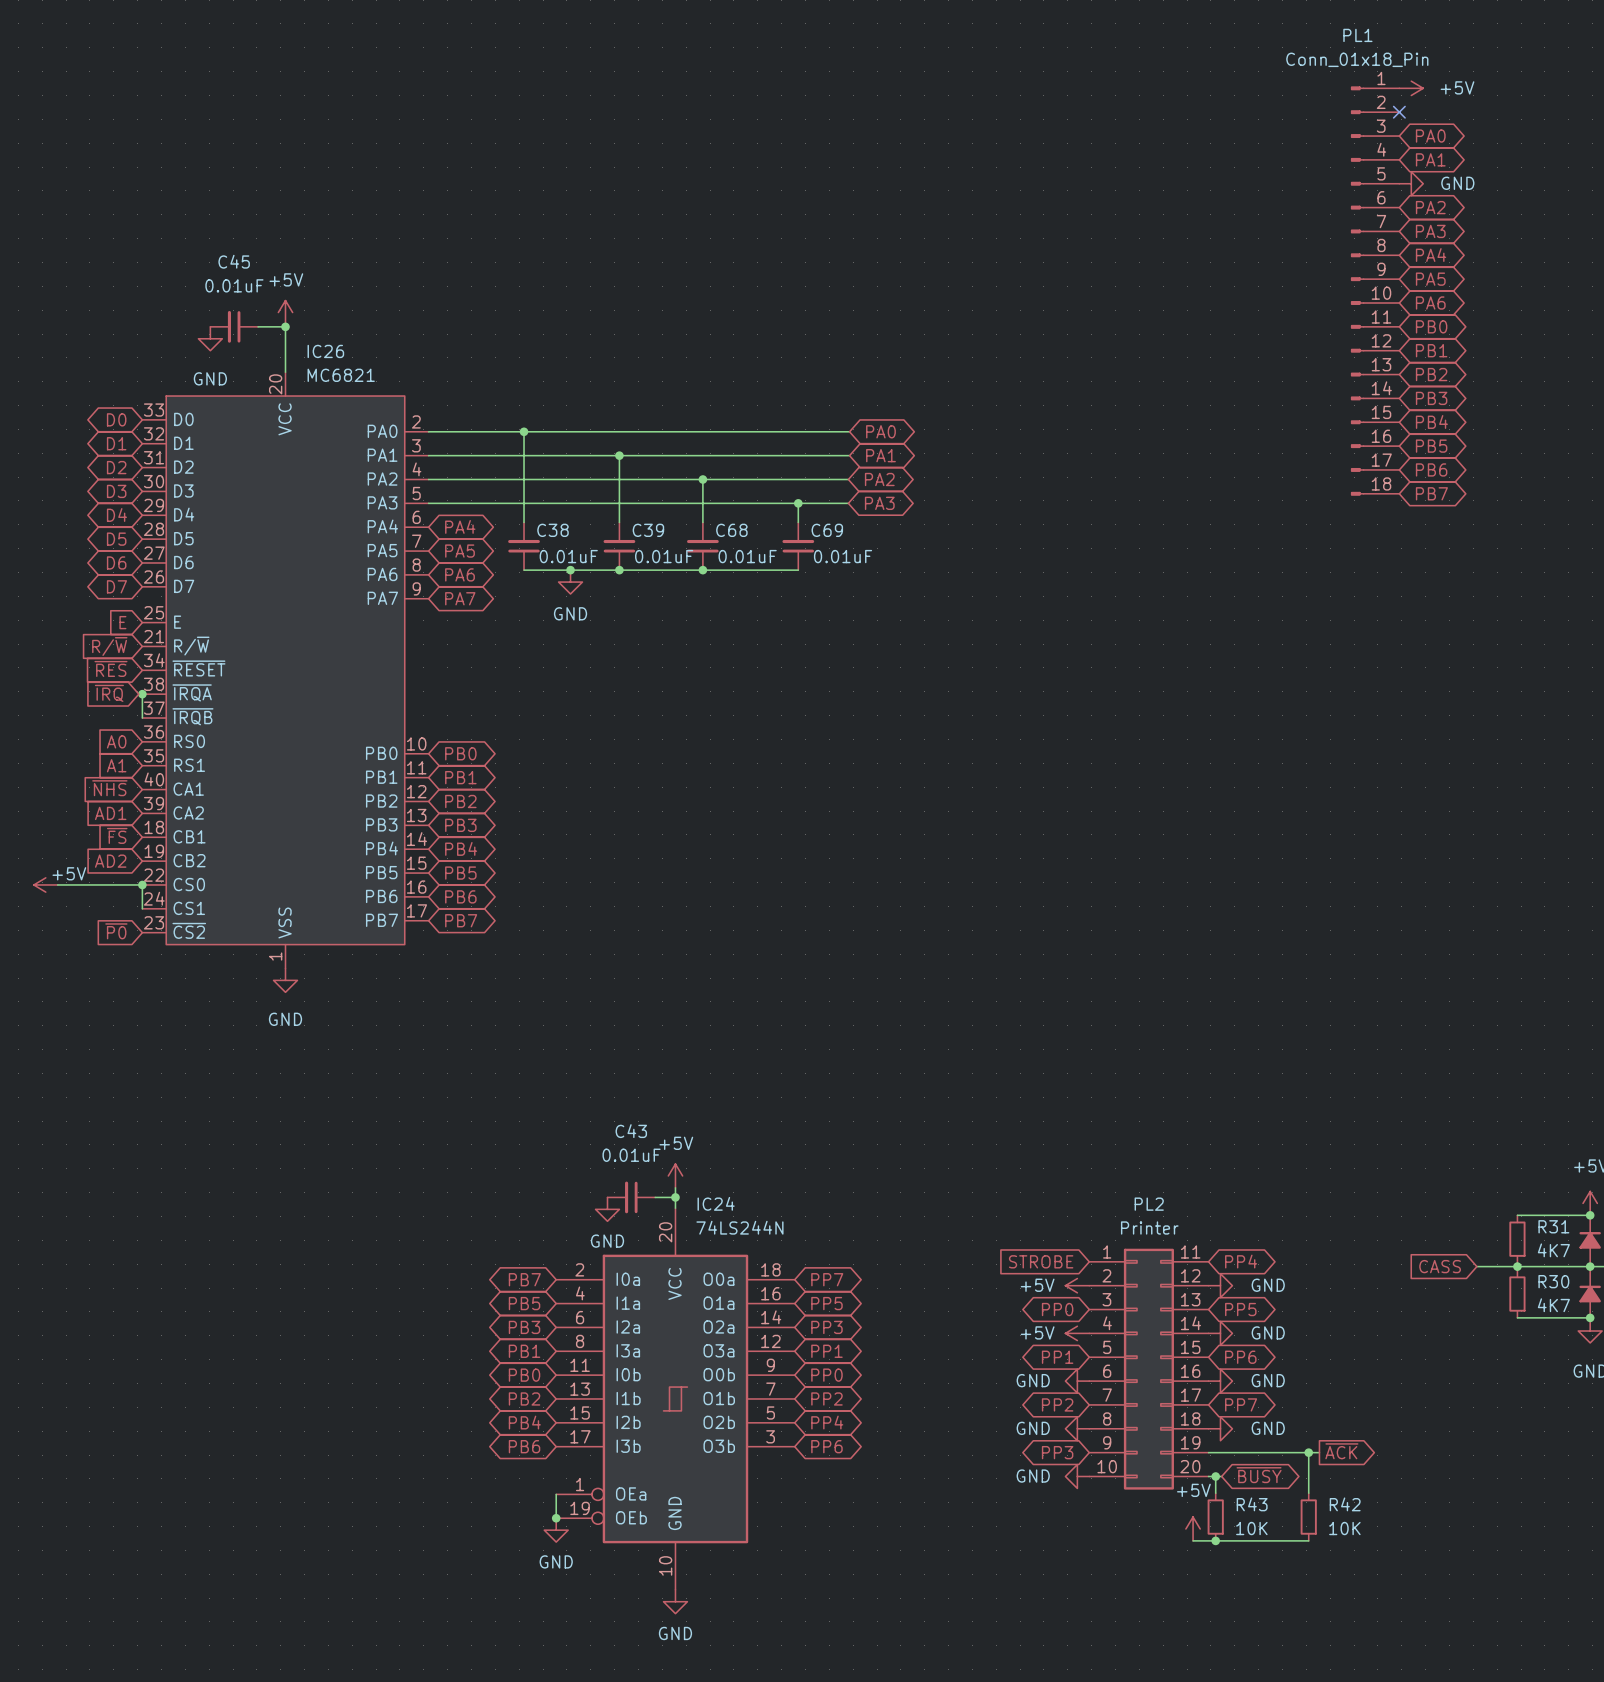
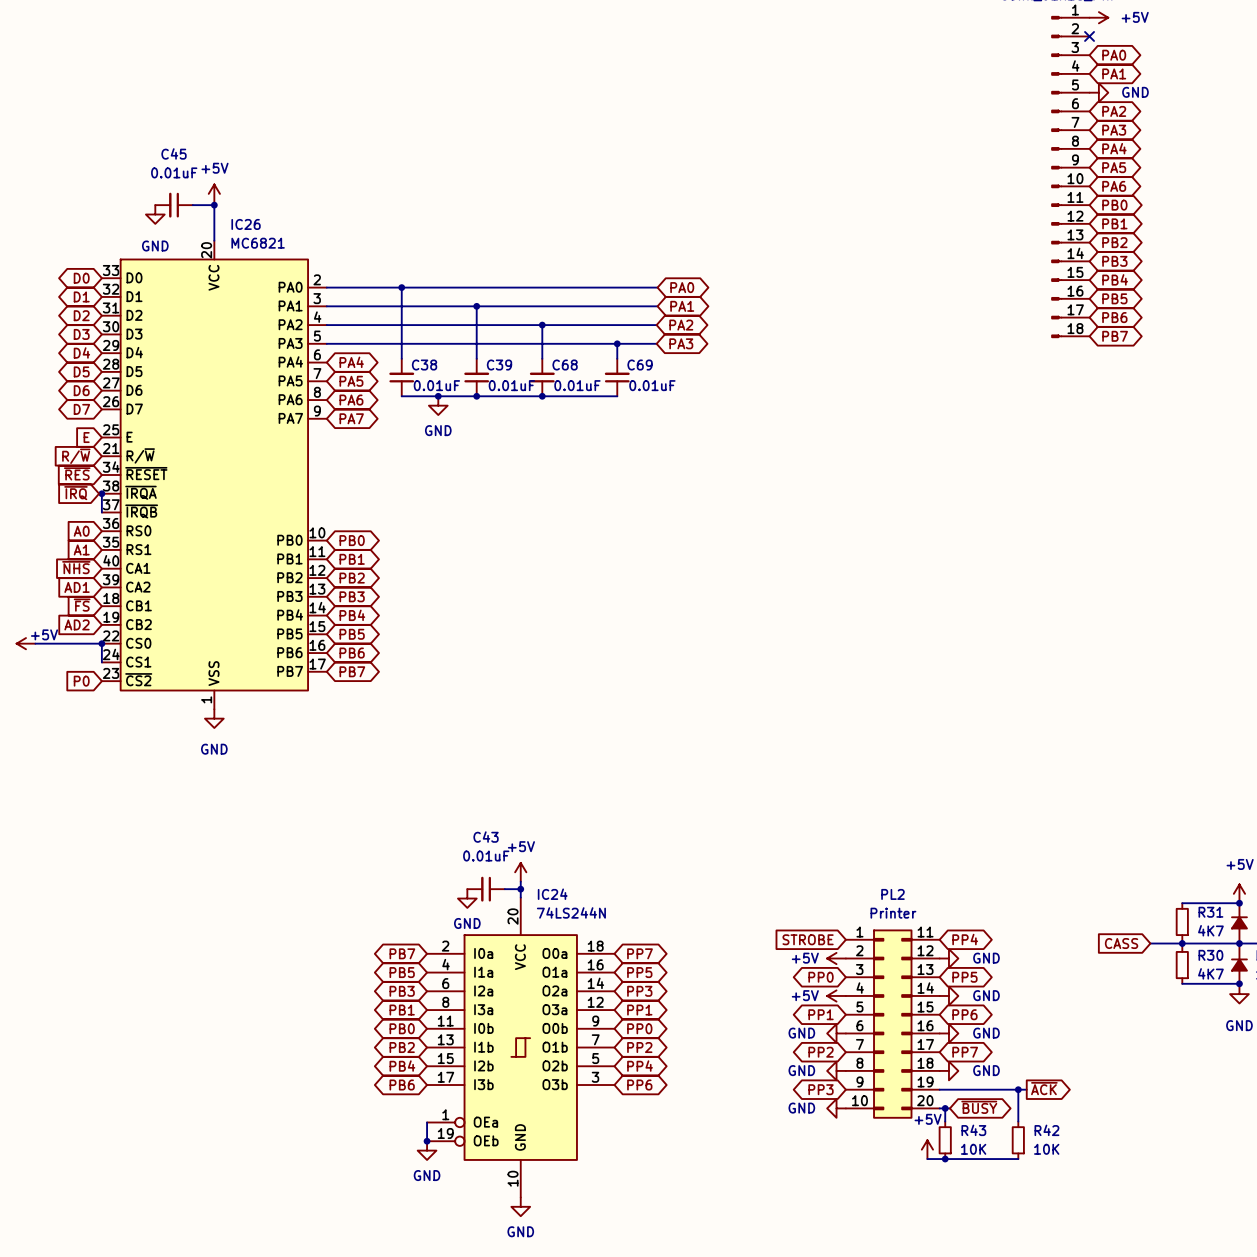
global label: ~{P0} (116, 931) -> P0 (81, 681)

